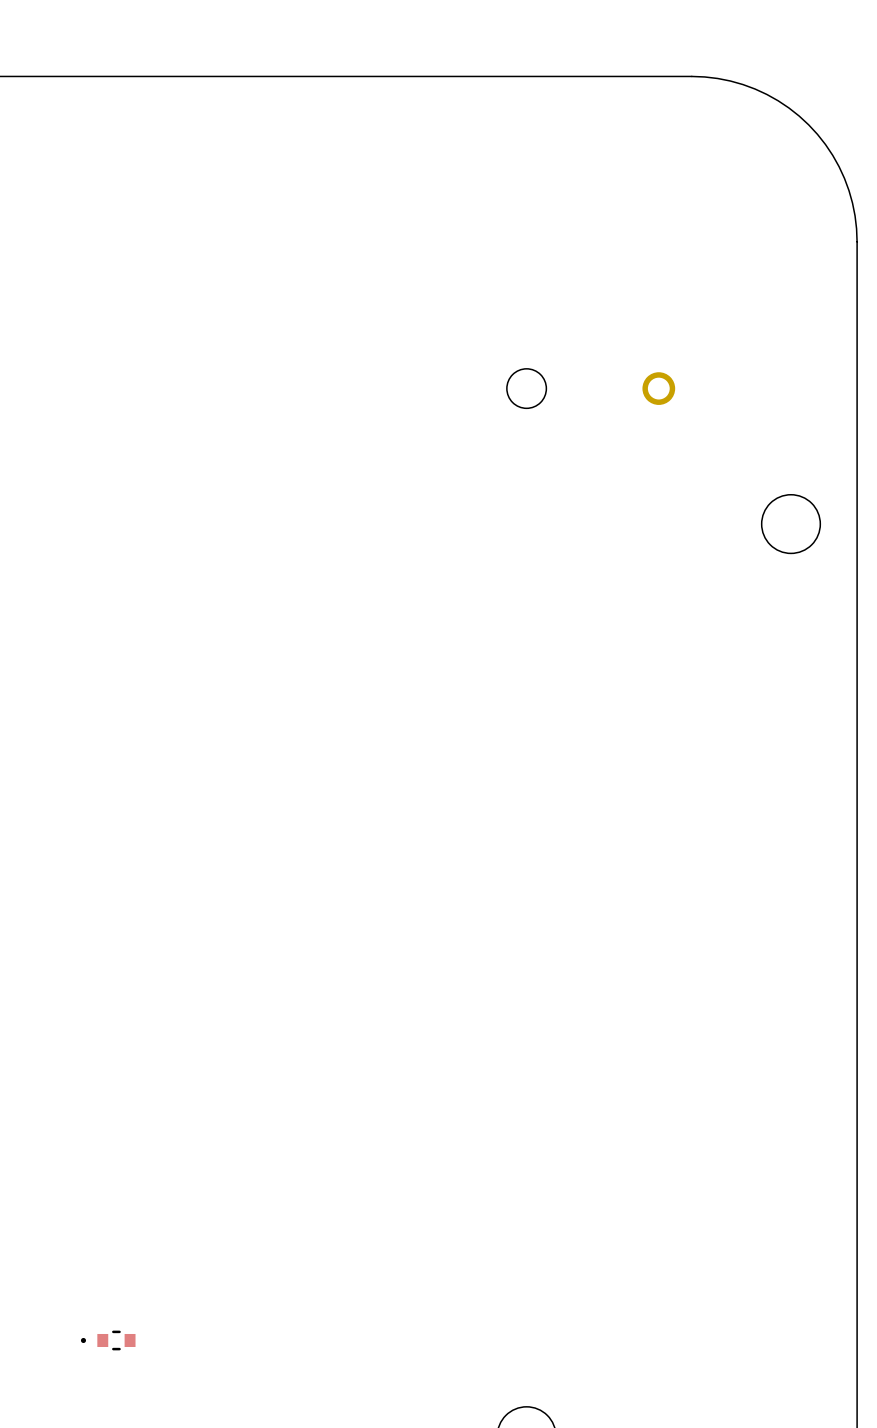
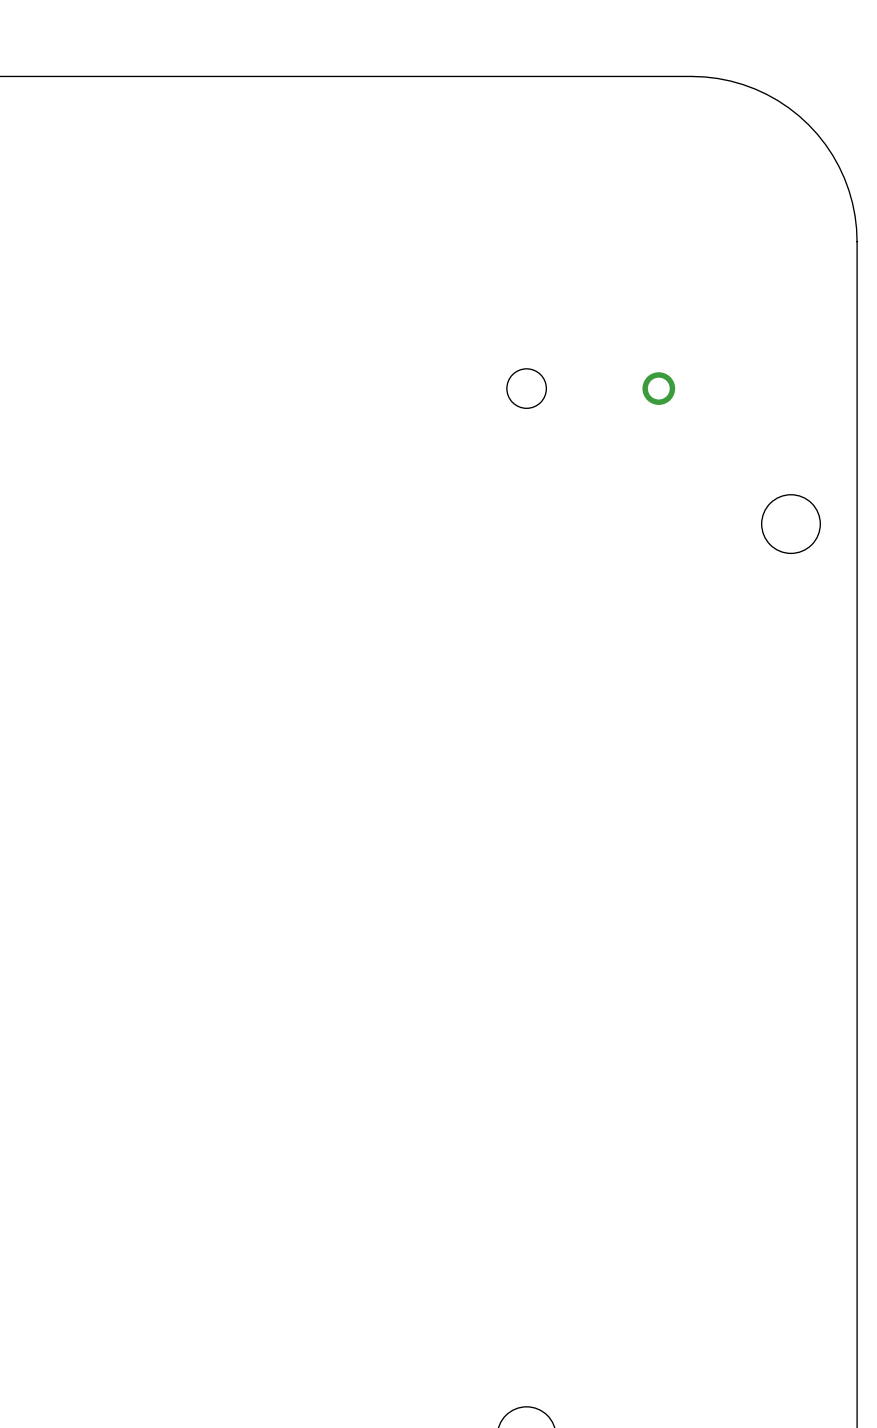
part: (108, 1340) -> none

